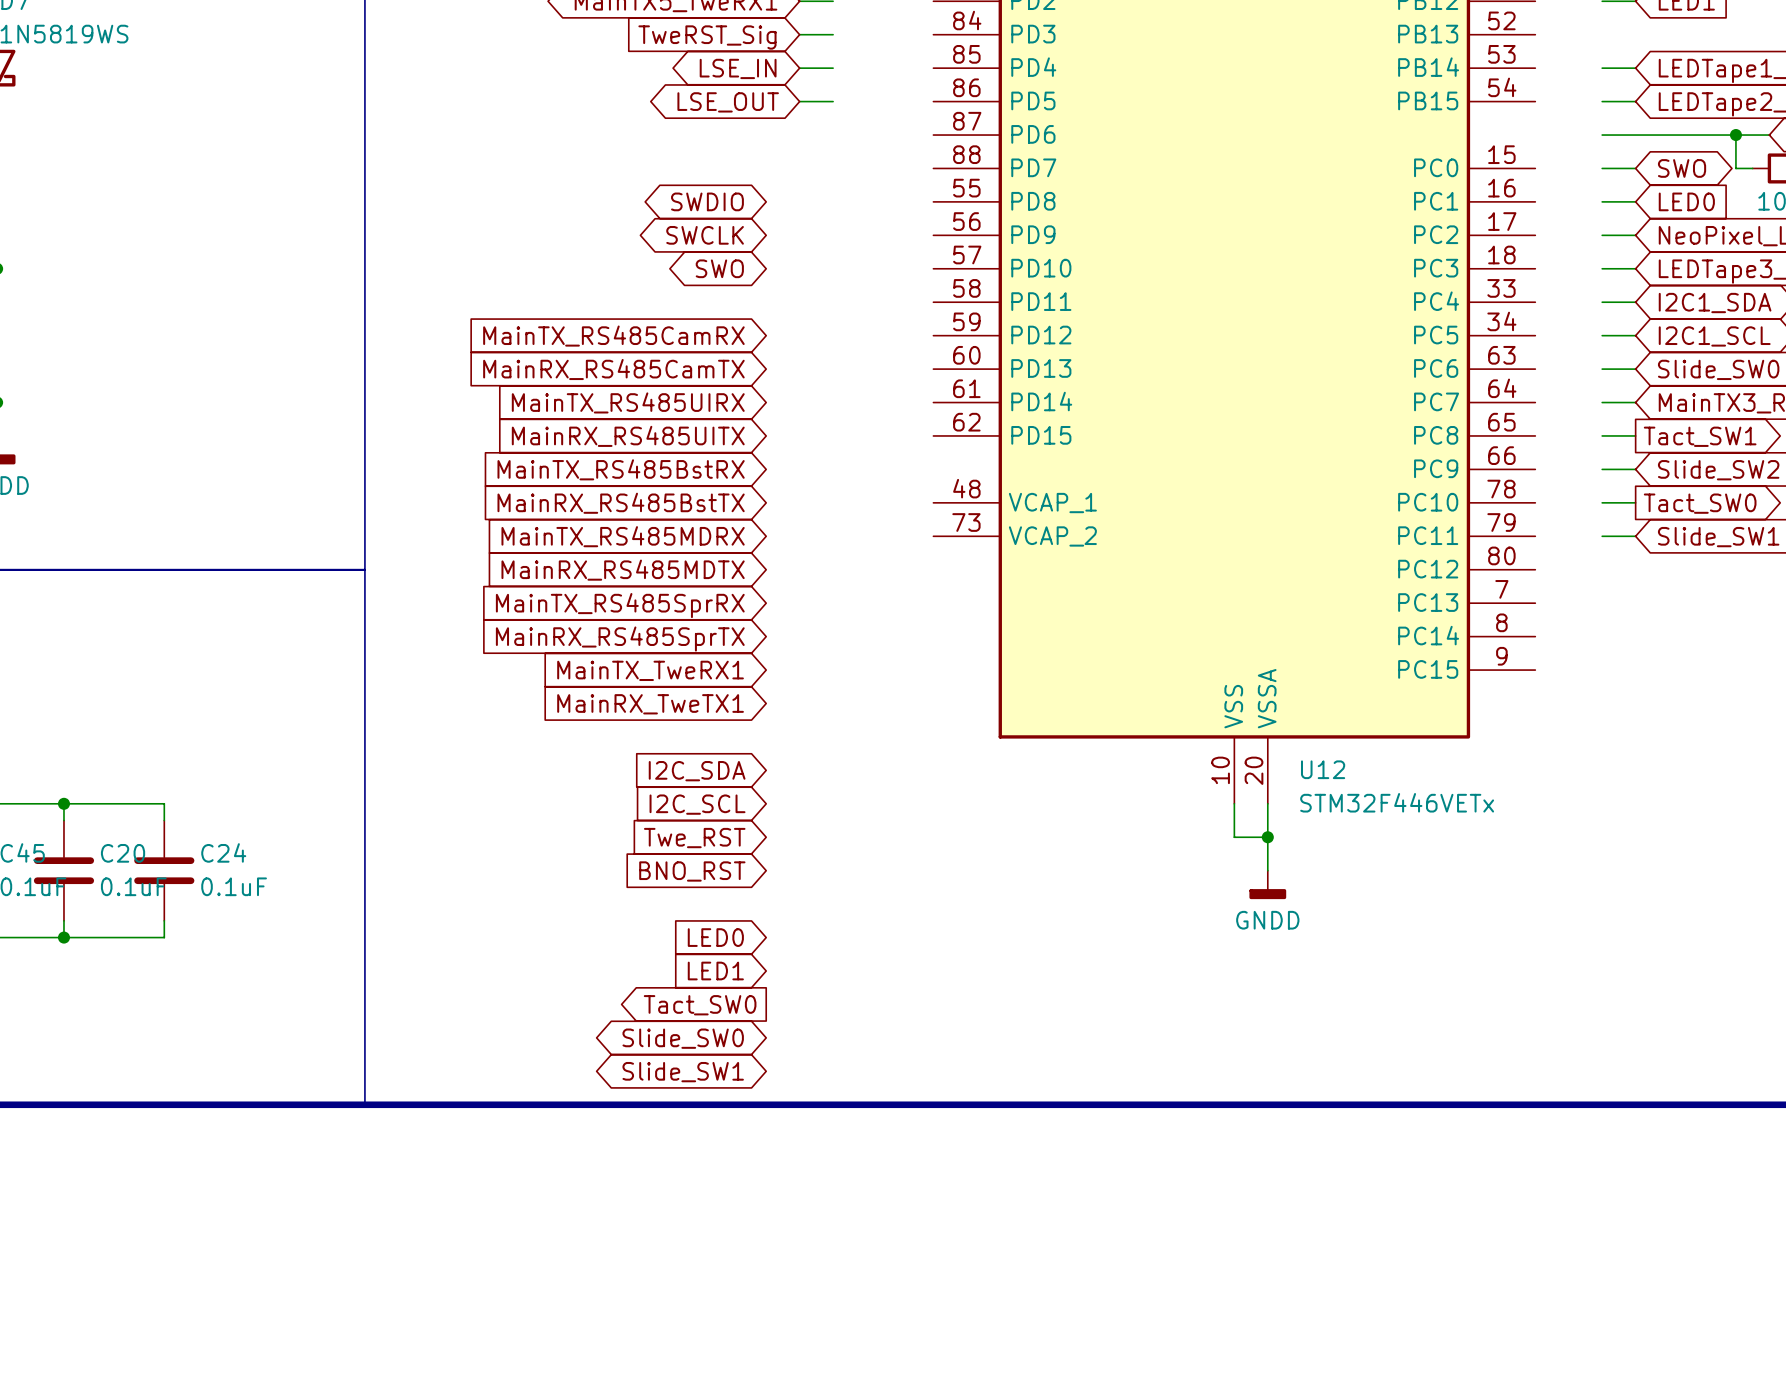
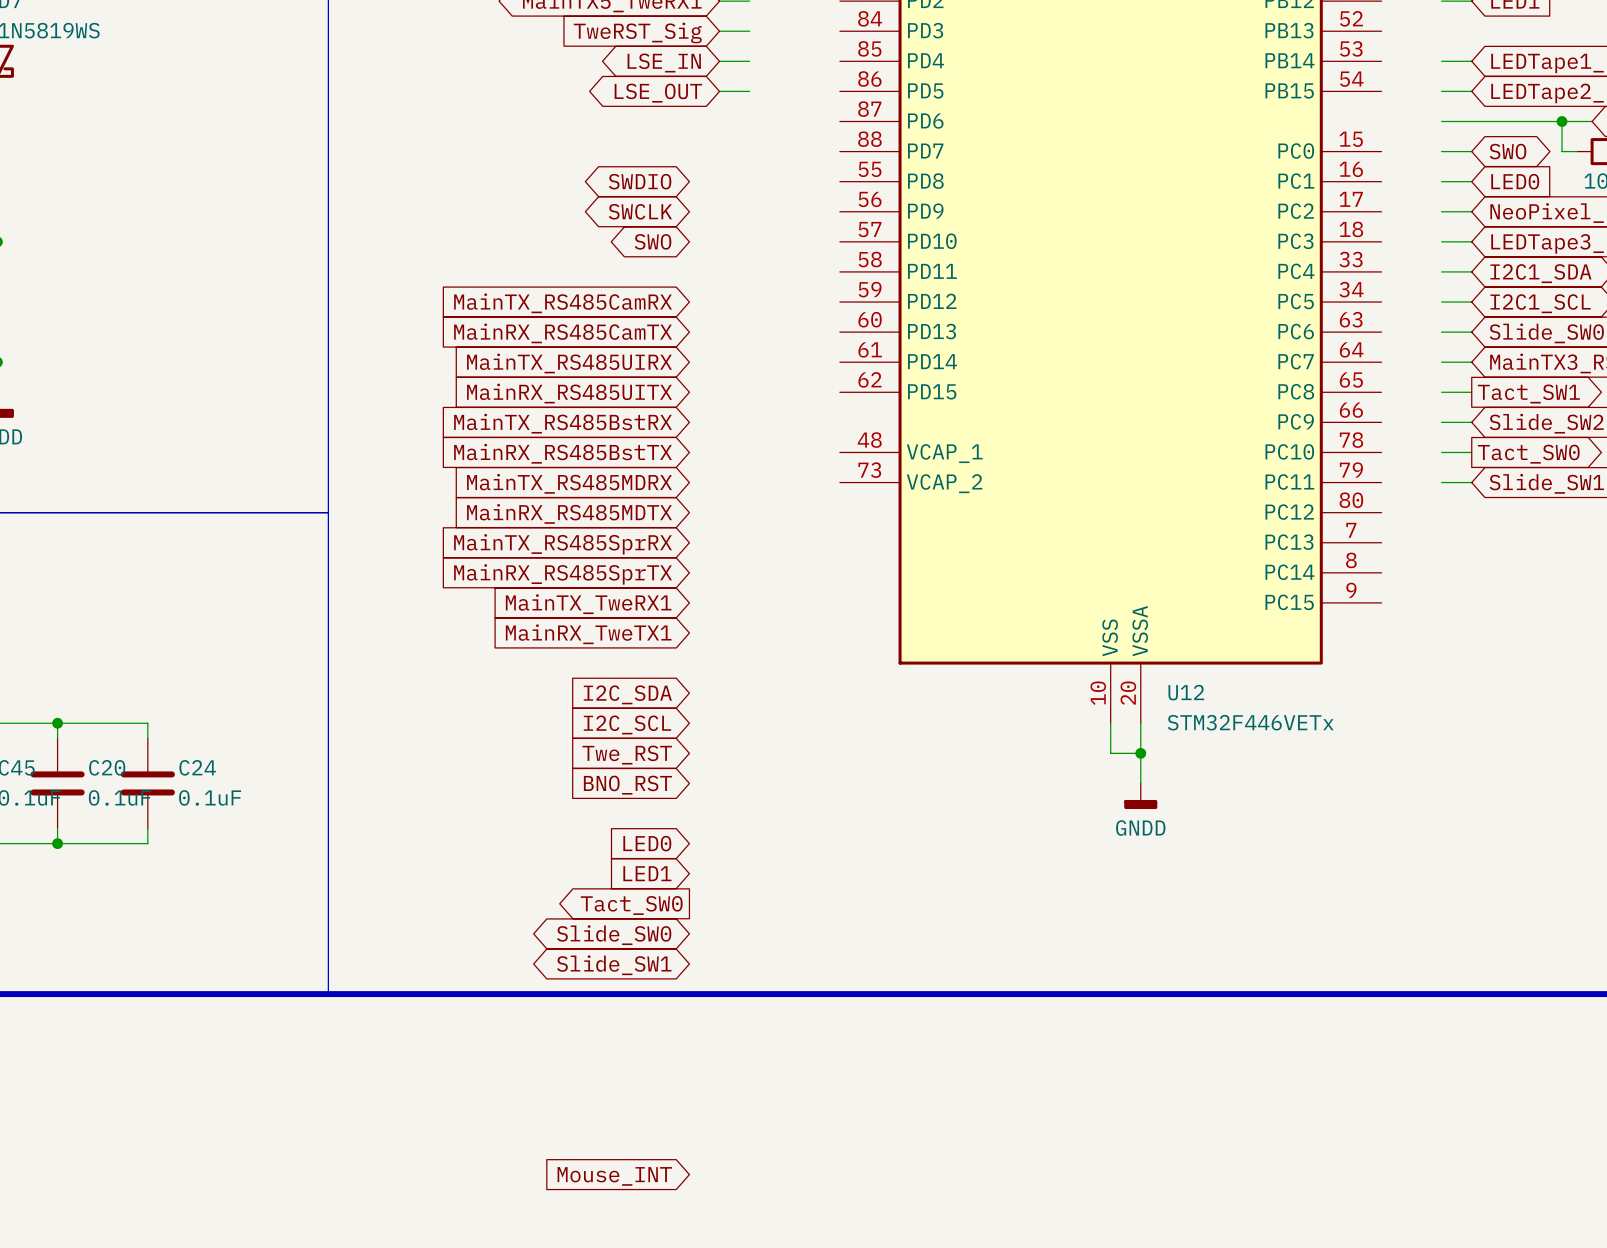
global label: none -> Mouse_INT (614, 1176)

